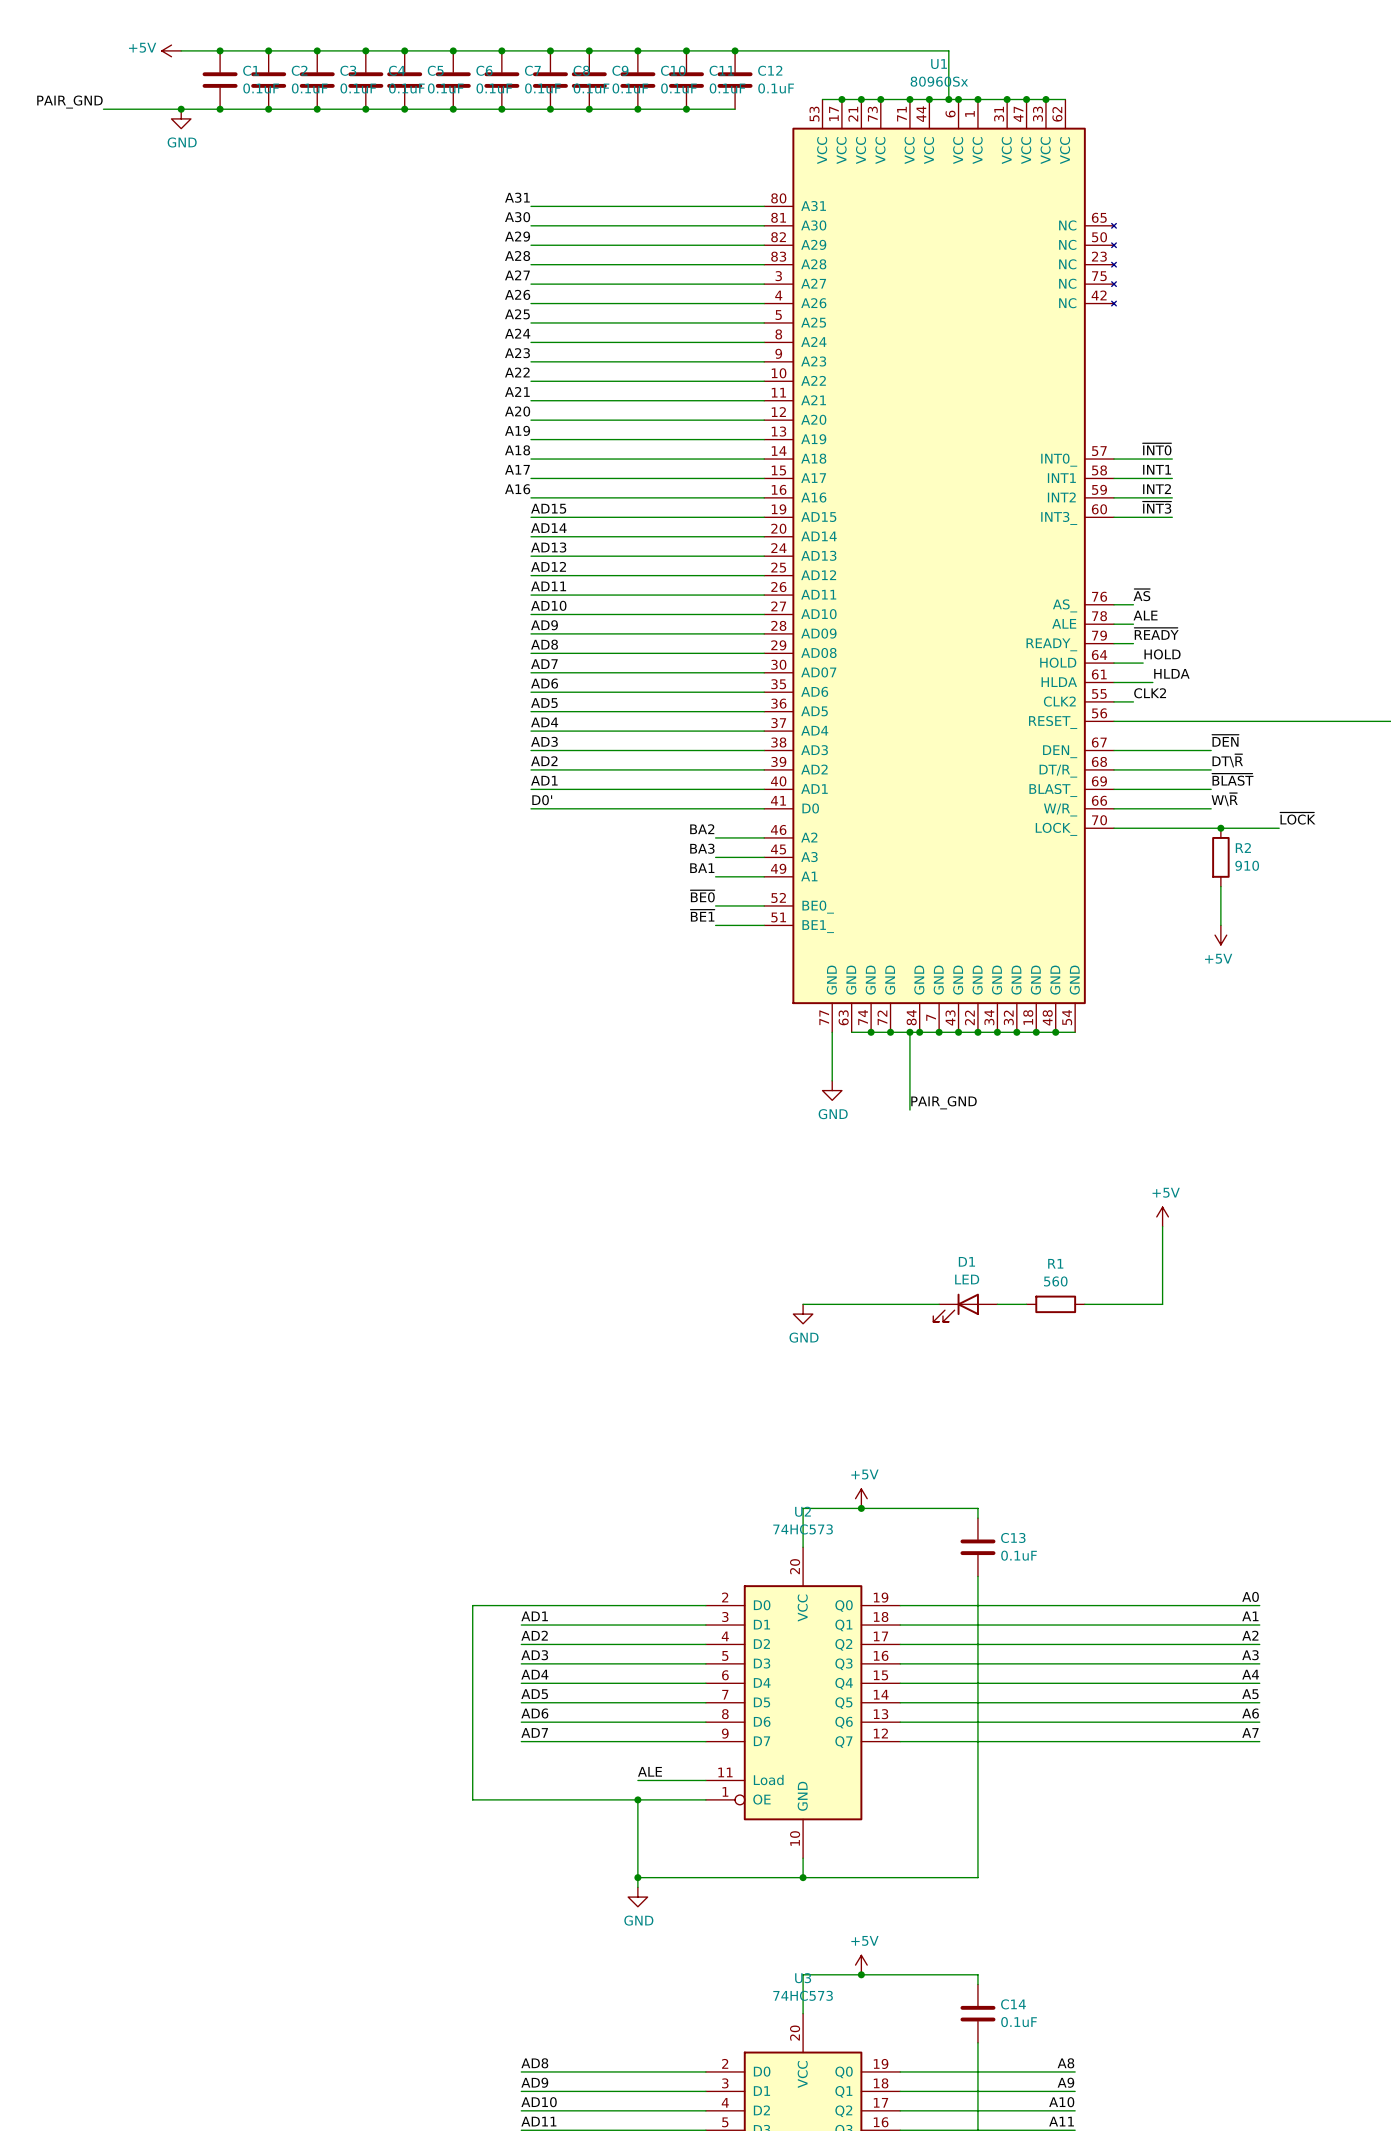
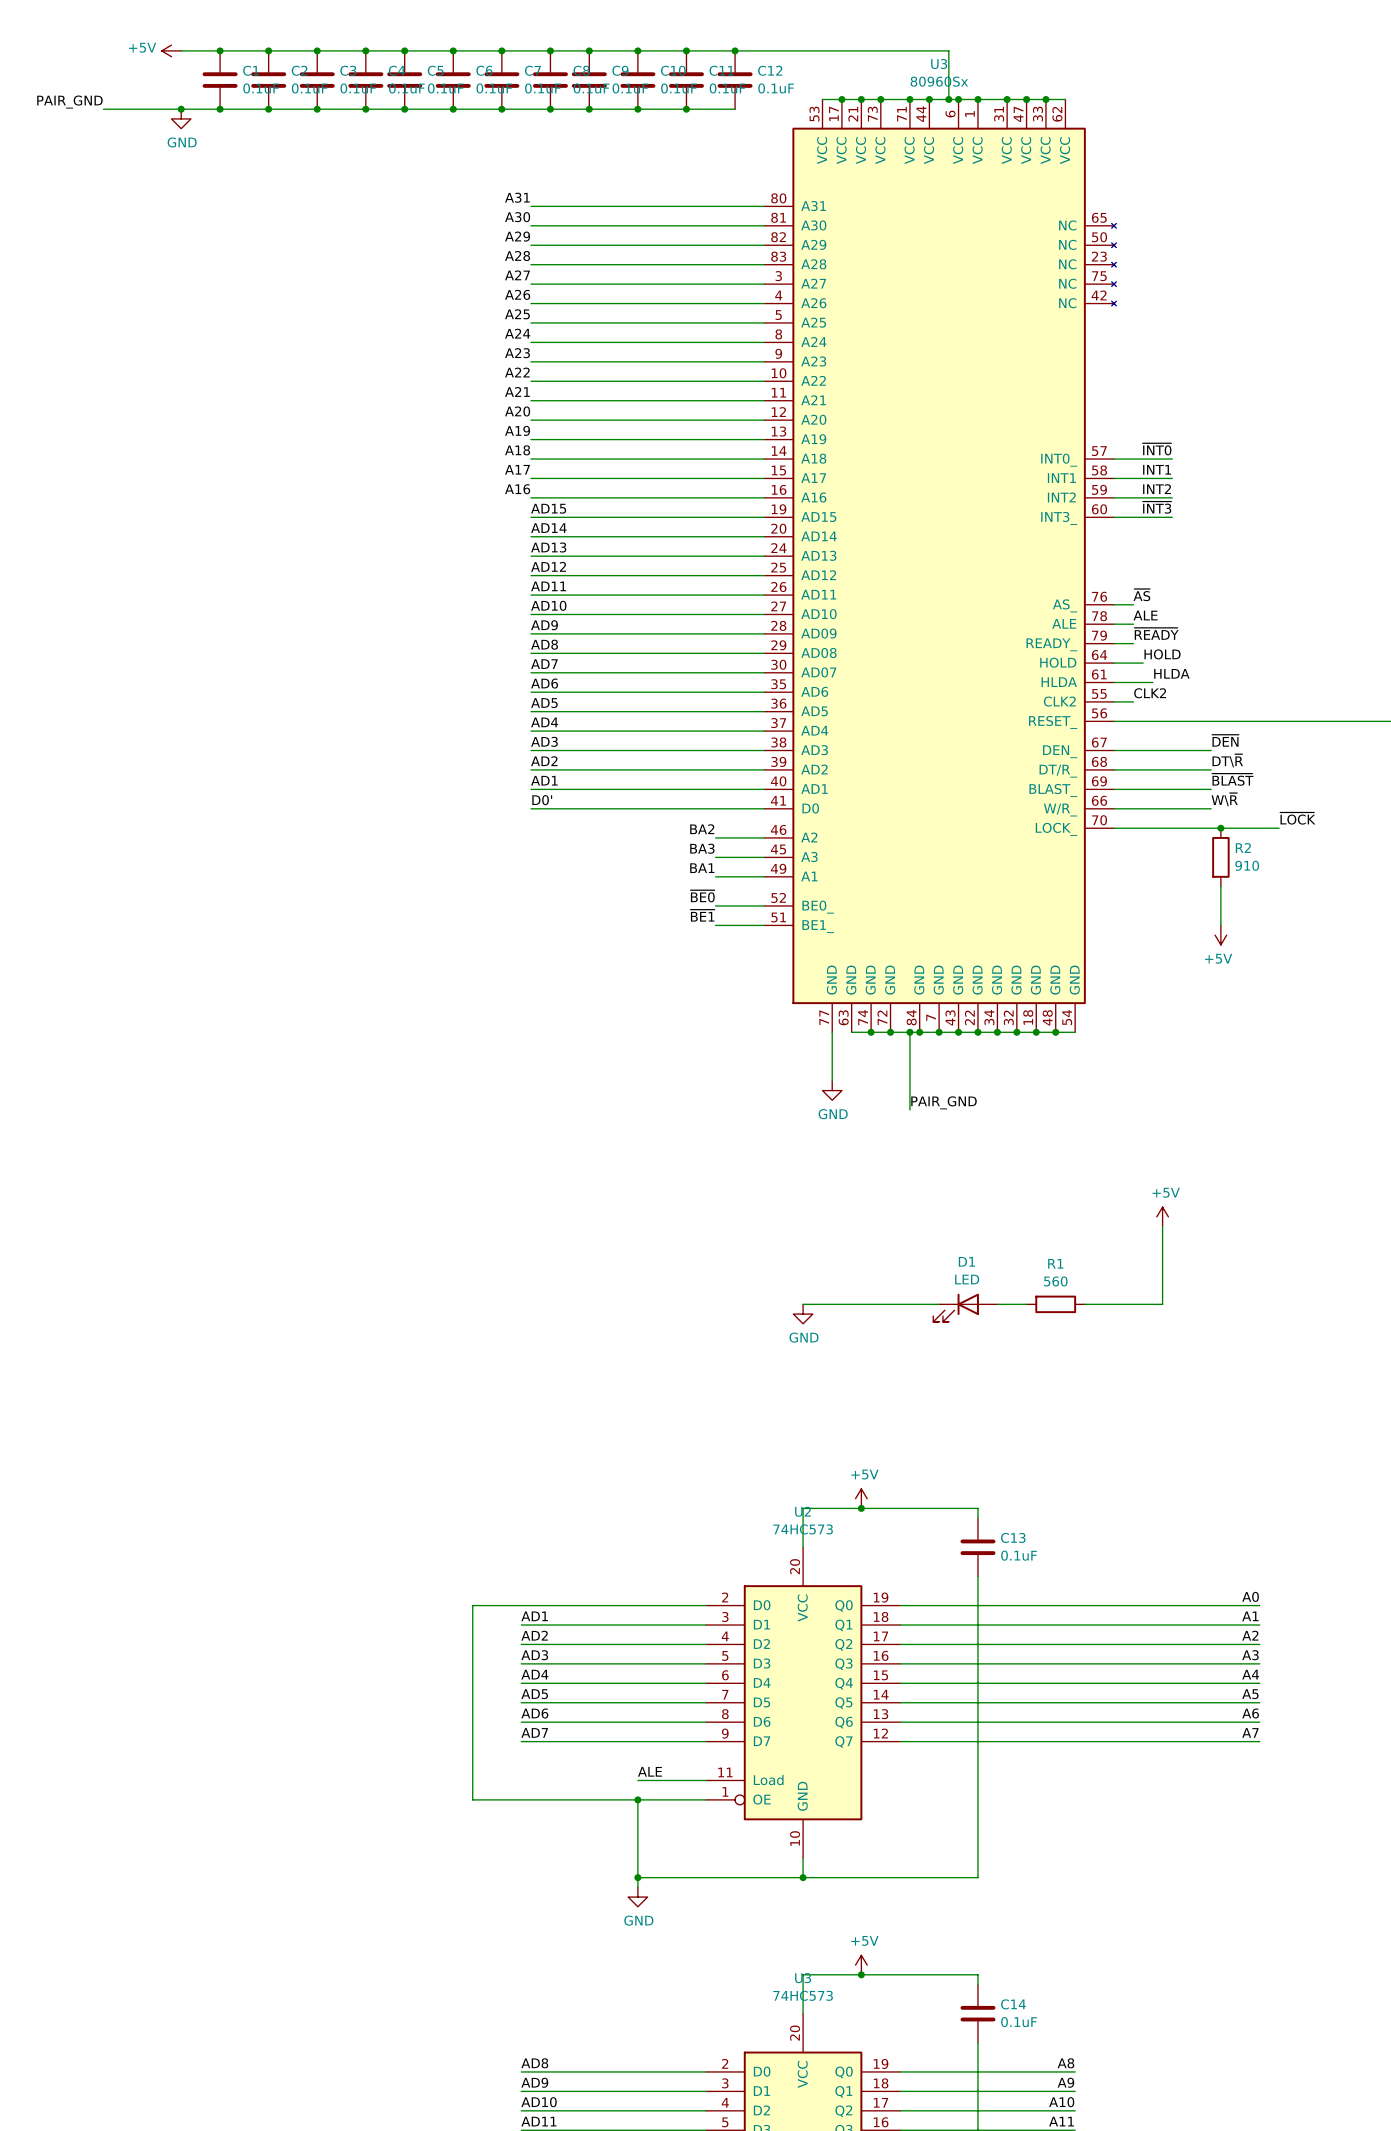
U1 name: U1 (939, 64) -> U3 (939, 63)

